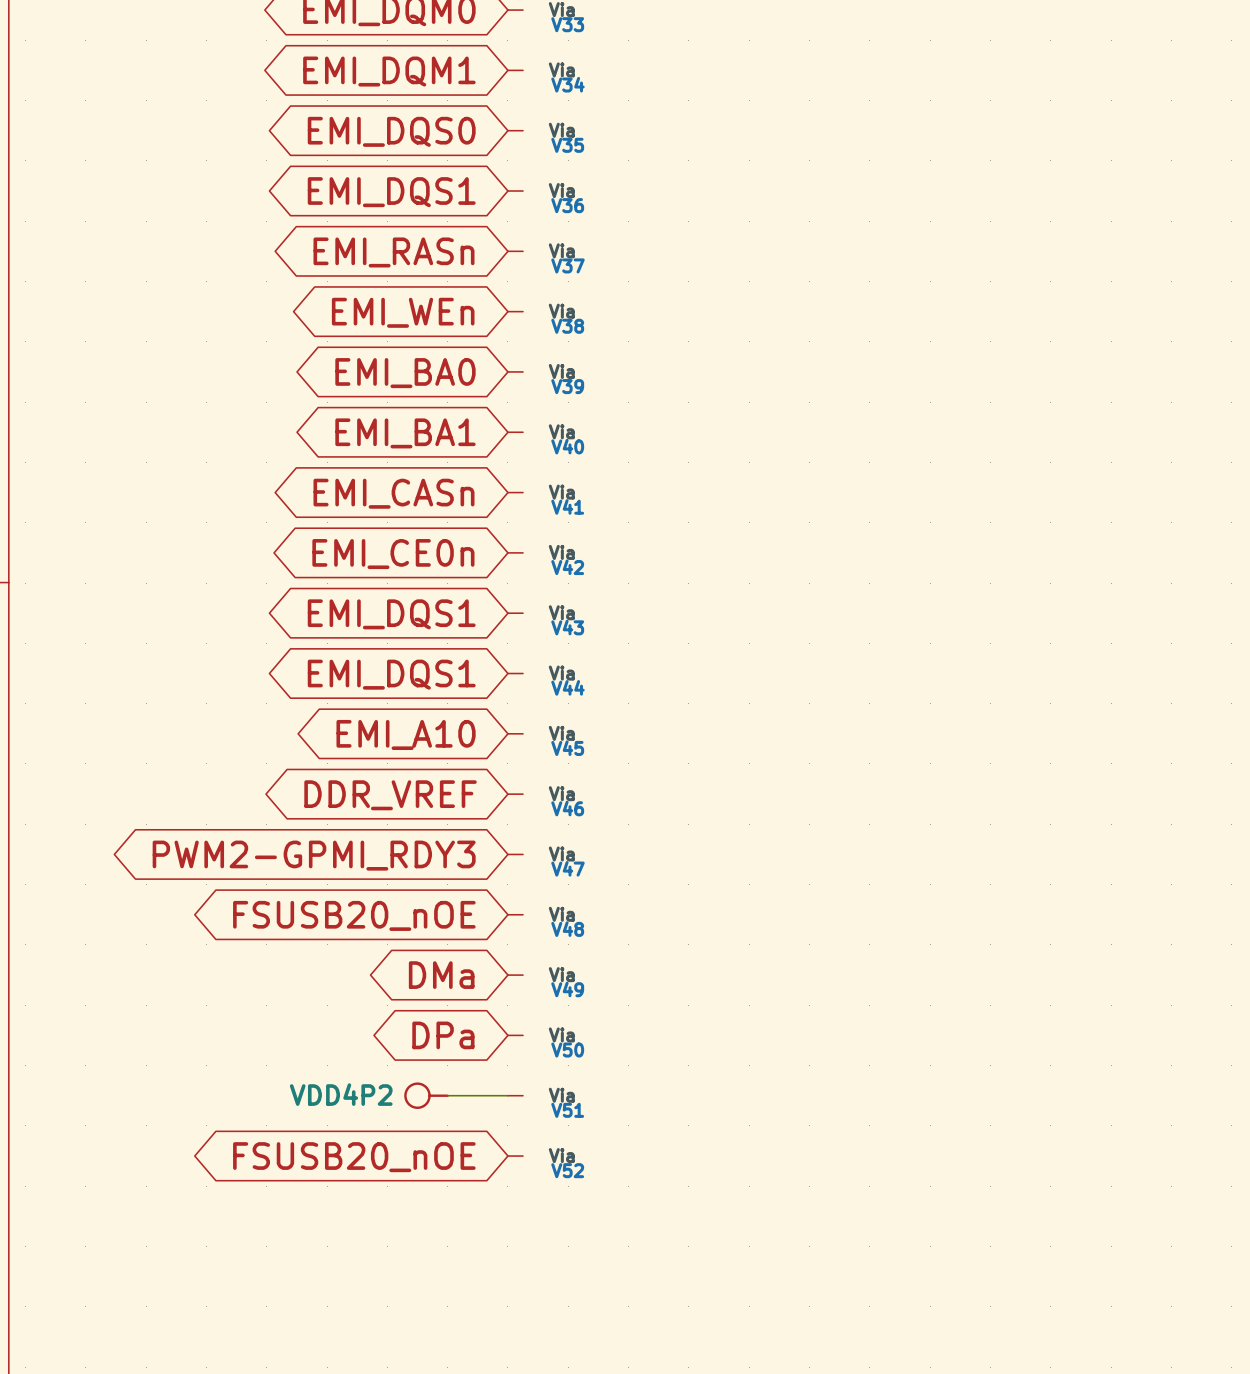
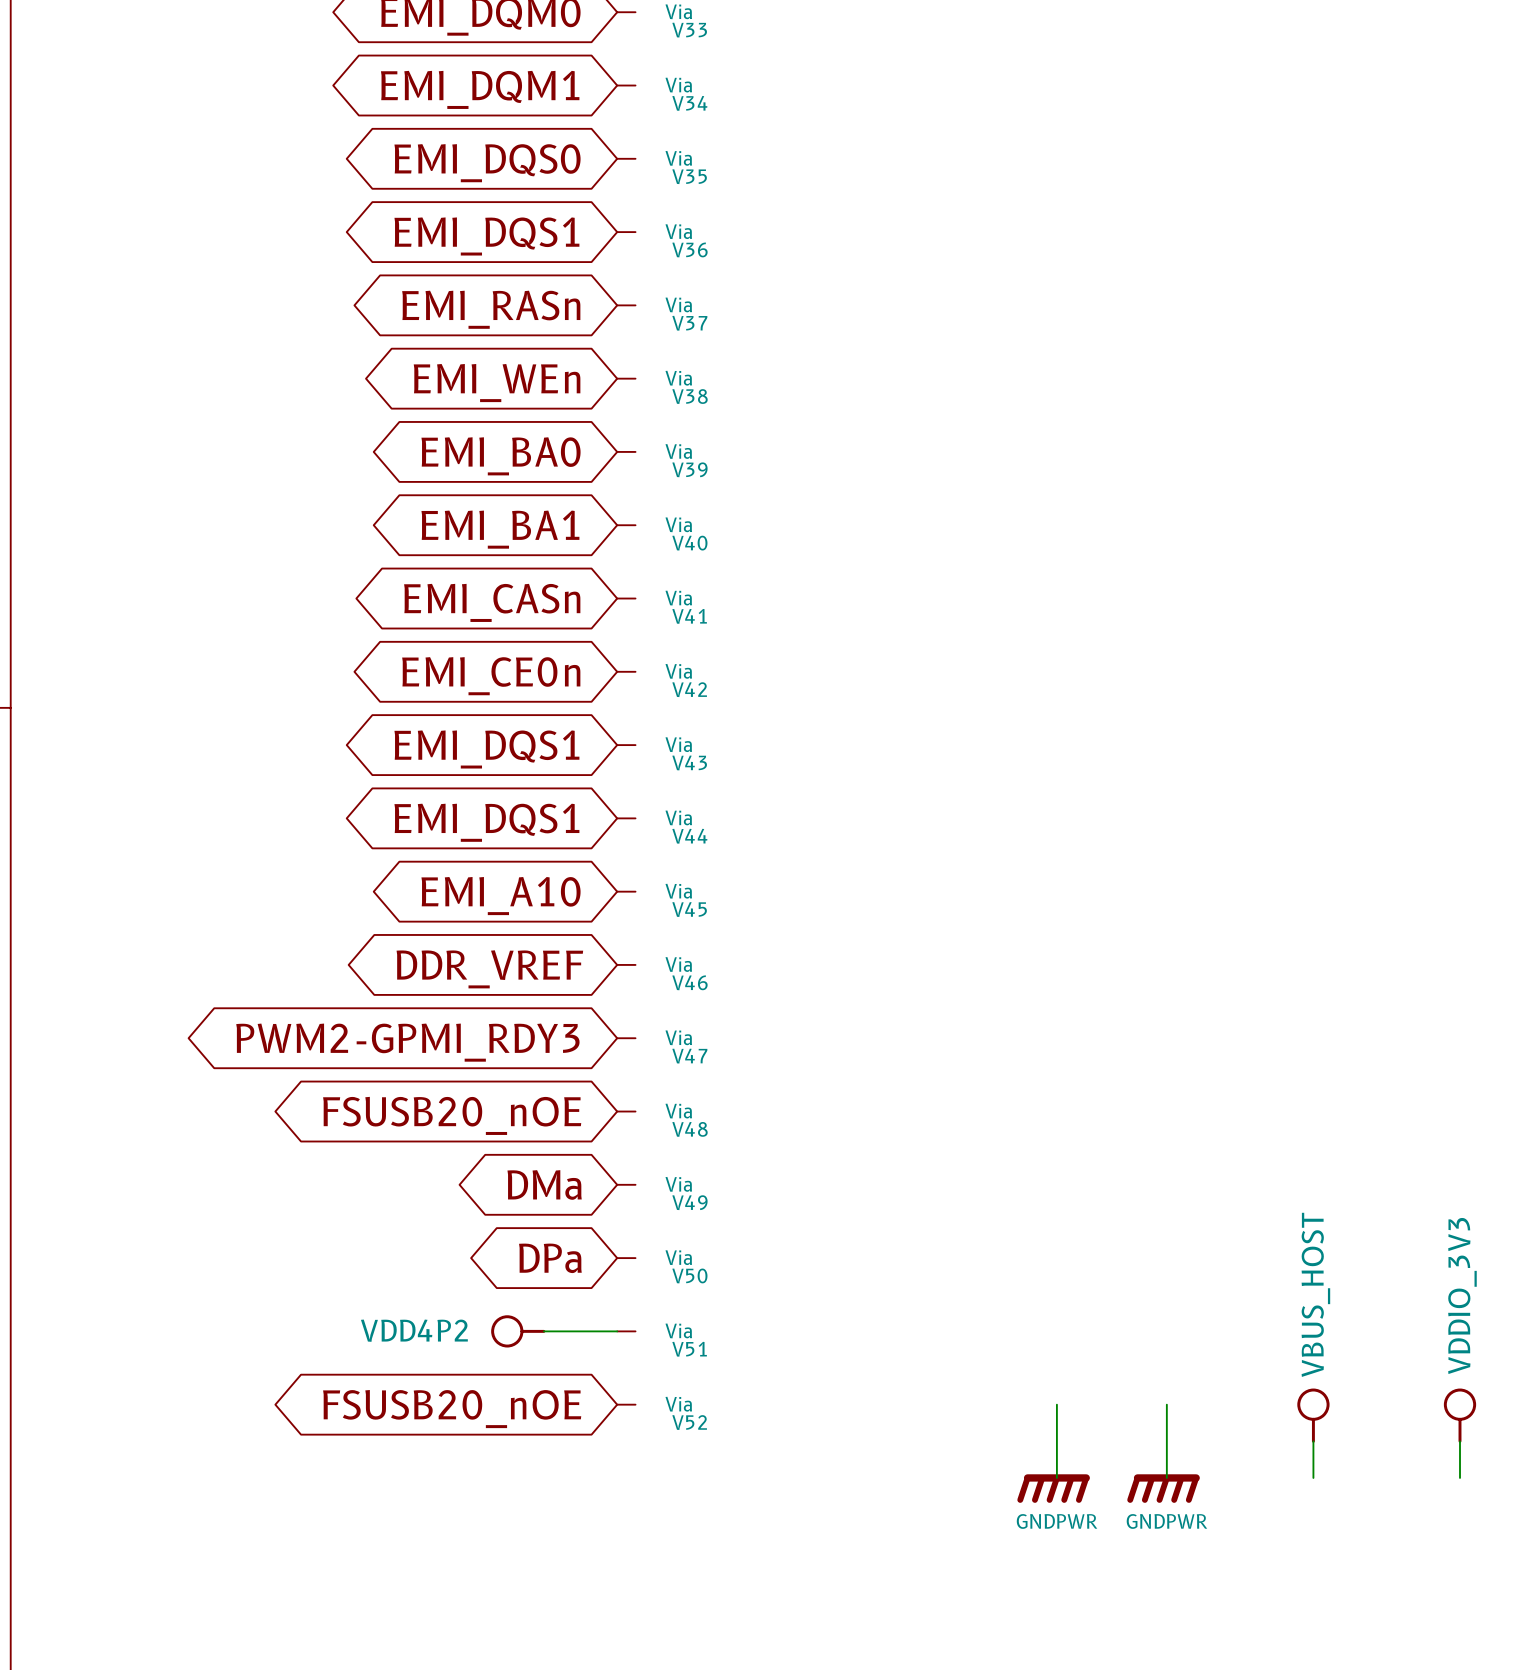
wire: none -> (1056, 1404) (1056, 1477)
wire: none -> (1166, 1404) (1166, 1477)
power symbol: none -> VBUS_HOST (1313, 1415)
power symbol: none -> VDDIO_3V3 (1460, 1415)
wire: none -> (1313, 1441) (1313, 1477)
wire: none -> (1460, 1441) (1460, 1477)
power symbol: none -> GNDPWR (1053, 1488)
power symbol: none -> GNDPWR (1163, 1488)

